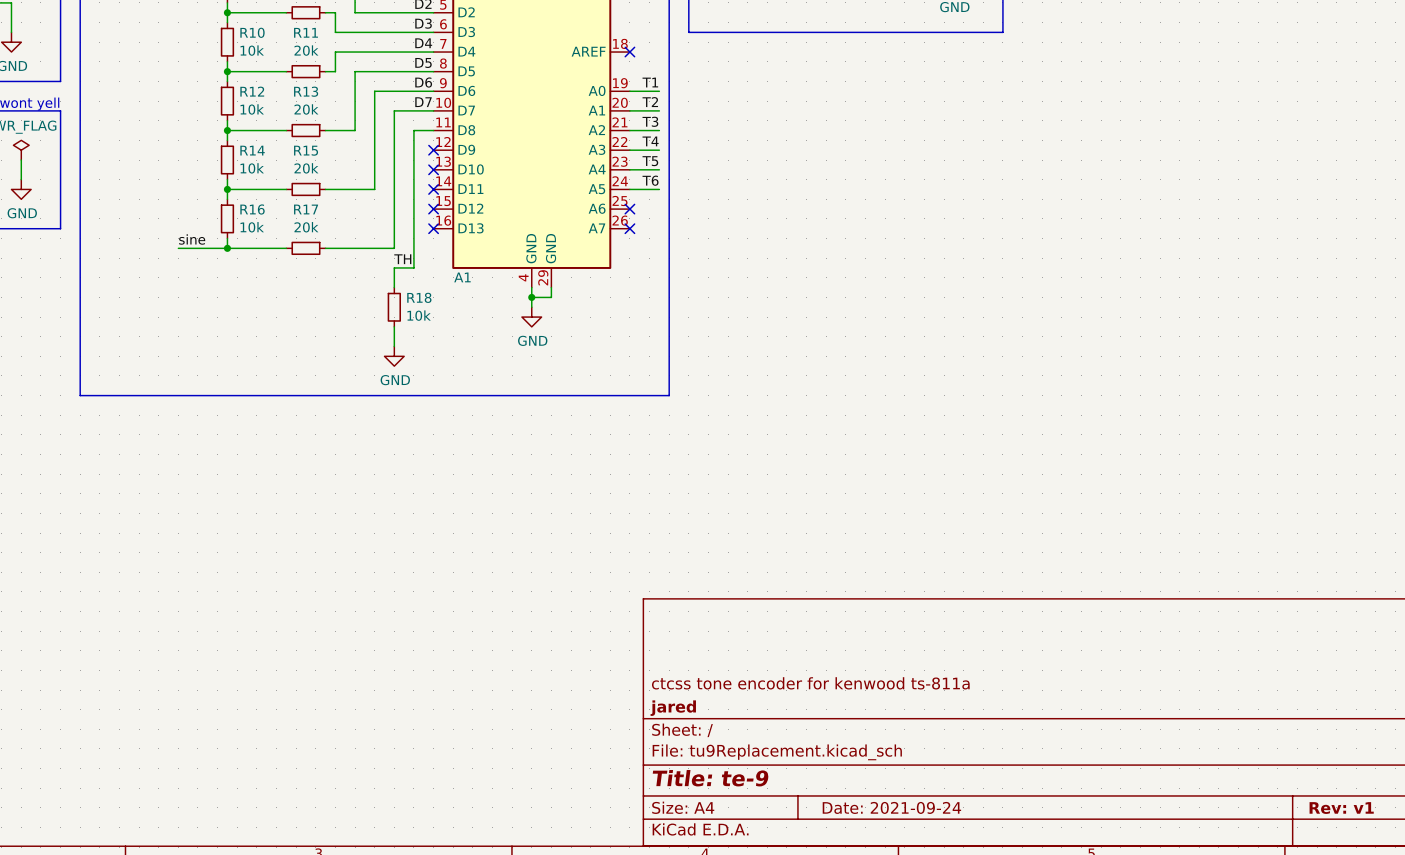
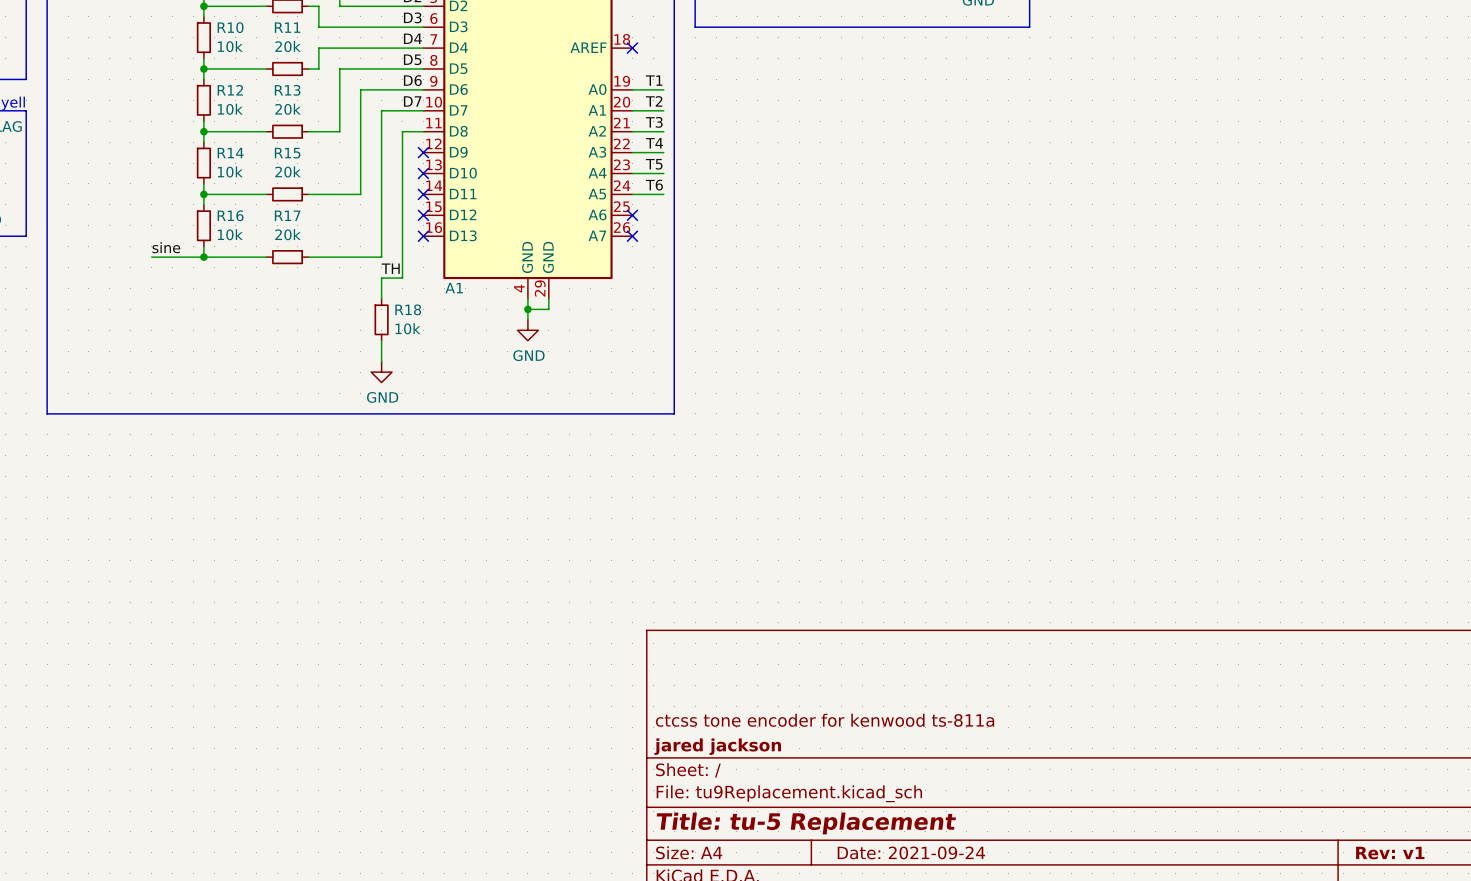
title block: jared (673, 708) -> jared jackson (717, 746)
title block: Title: te-9 (710, 778) -> Title: tu-5 Replacement (806, 823)

